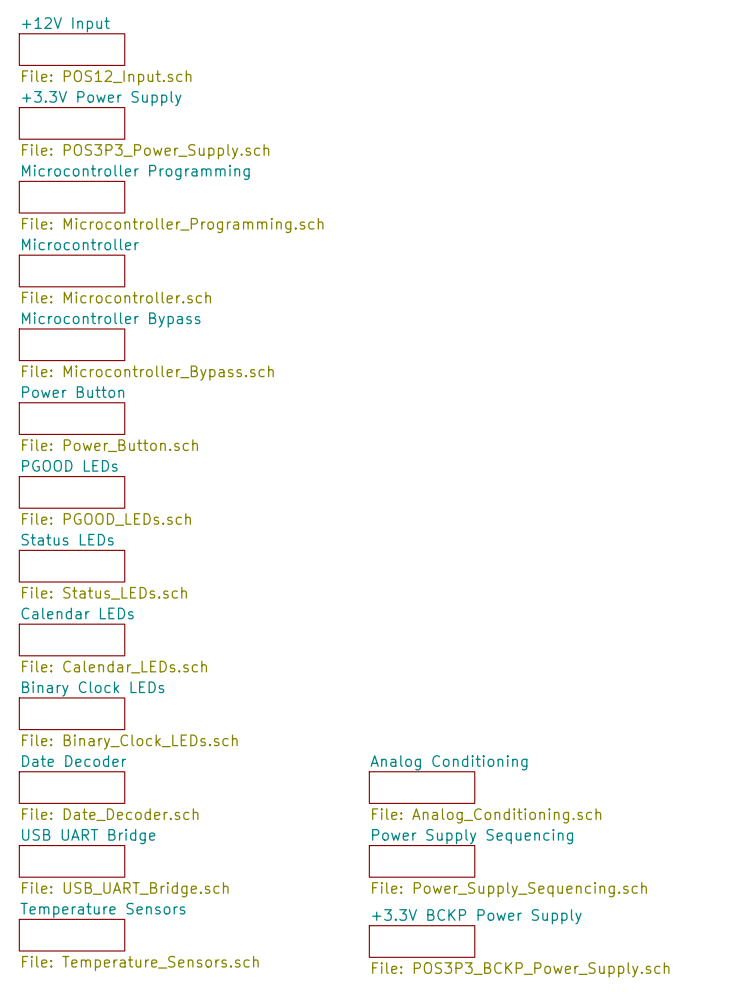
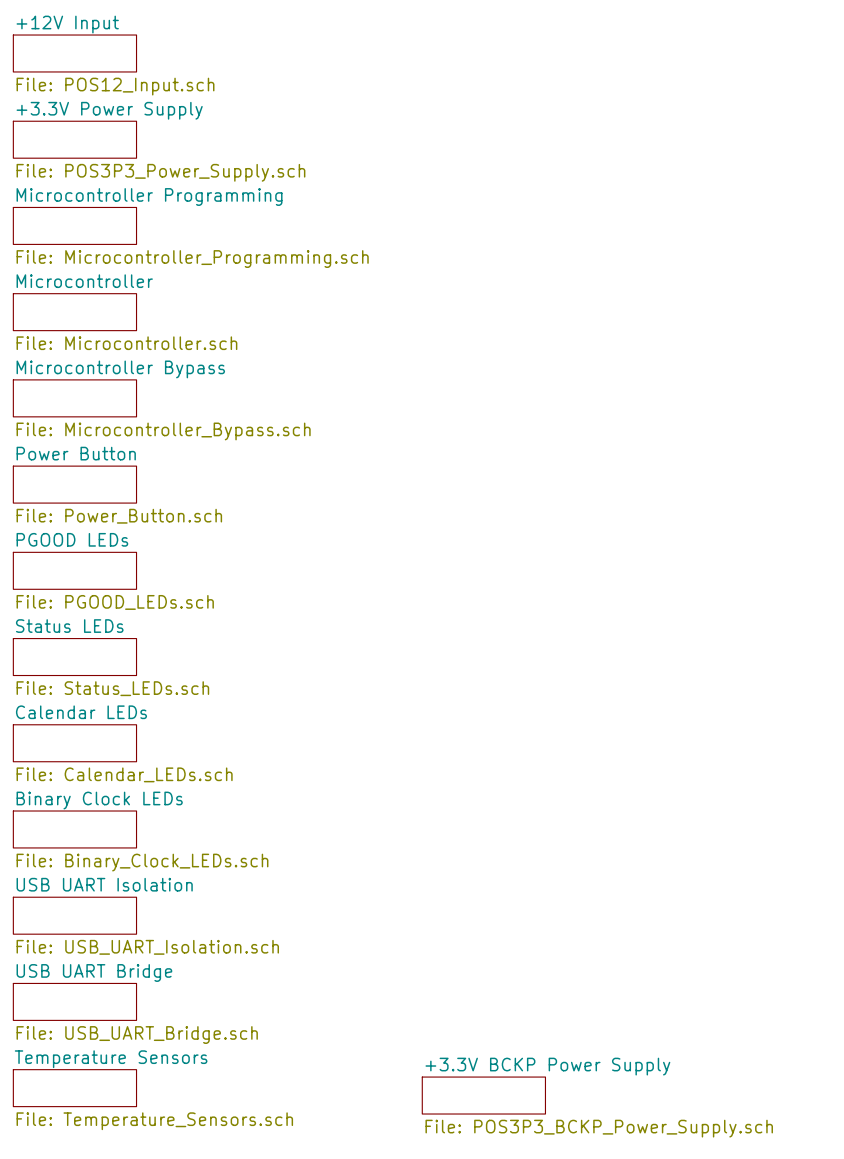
sheet Date Decoder name: Date Decoder (74, 761) -> USB UART Isolation (104, 884)
sheet Analog Conditioning: File: Analog_Conditioning.sch (422, 787) -> none
sheet Date Decoder value: File: Date_Decoder.sch (110, 814) -> File: USB_UART_Isolation.sch (147, 947)
sheet Power Supply Sequencing: File: Power_Supply_Sequencing.sch (422, 861) -> none

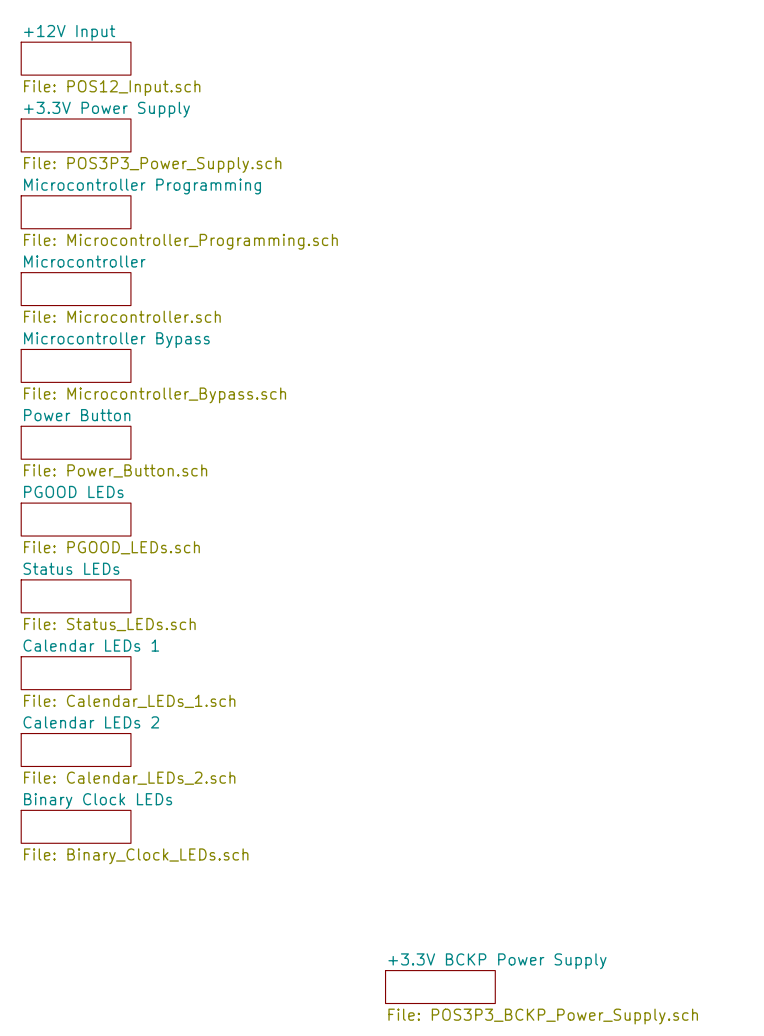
sheet Calendar LEDs name: Calendar LEDs (81, 712) -> Calendar LEDs 1 (91, 645)
sheet Calendar LEDs value: File: Calendar_LEDs.sch (124, 774) -> File: Calendar_LEDs_1.sch (129, 701)
sheet Binary Clock LEDs name: Binary Clock LEDs (99, 800) -> Calendar LEDs 2 (91, 722)
sheet Binary Clock LEDs value: File: Binary_Clock_LEDs.sch (142, 862) -> File: Calendar_LEDs_2.sch (129, 778)
sheet USB UART Isolation name: USB UART Isolation (104, 884) -> Binary Clock LEDs (98, 801)
sheet USB UART Isolation value: File: USB_UART_Isolation.sch (147, 947) -> File: Binary_Clock_LEDs.sch (136, 856)
sheet USB UART Bridge: File: USB_UART_Bridge.sch (74, 1001) -> none
sheet Temperature Sensors: File: Temperature_Sensors.sch (74, 1088) -> none

